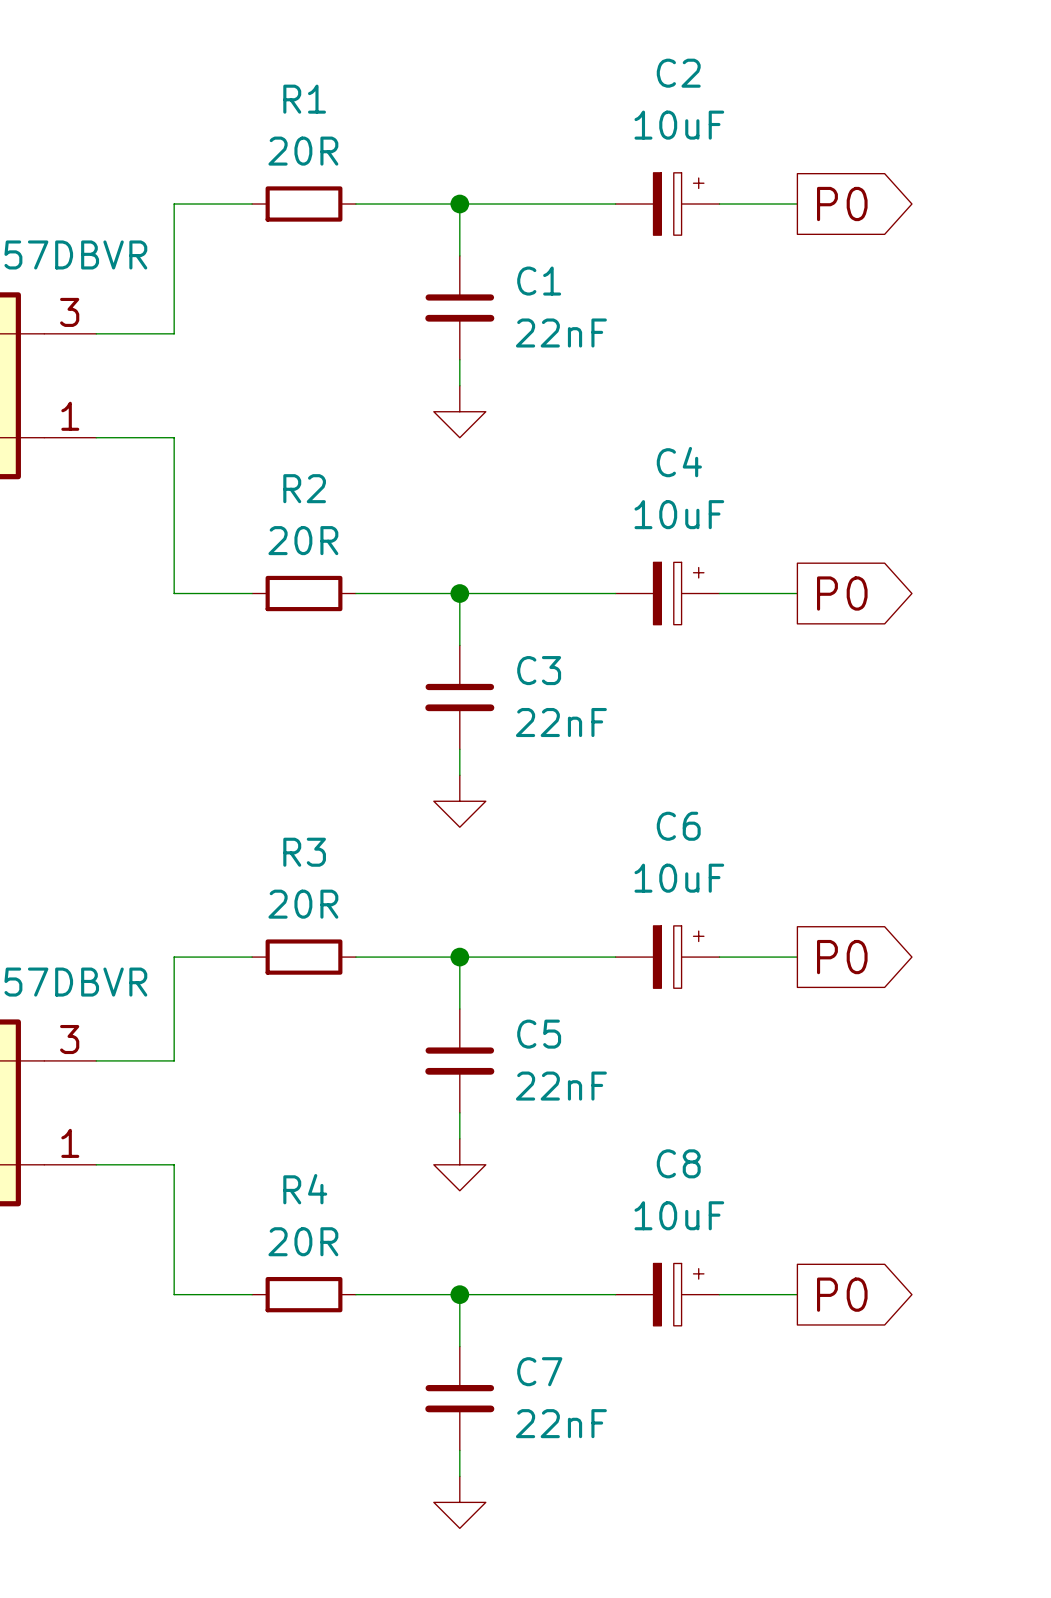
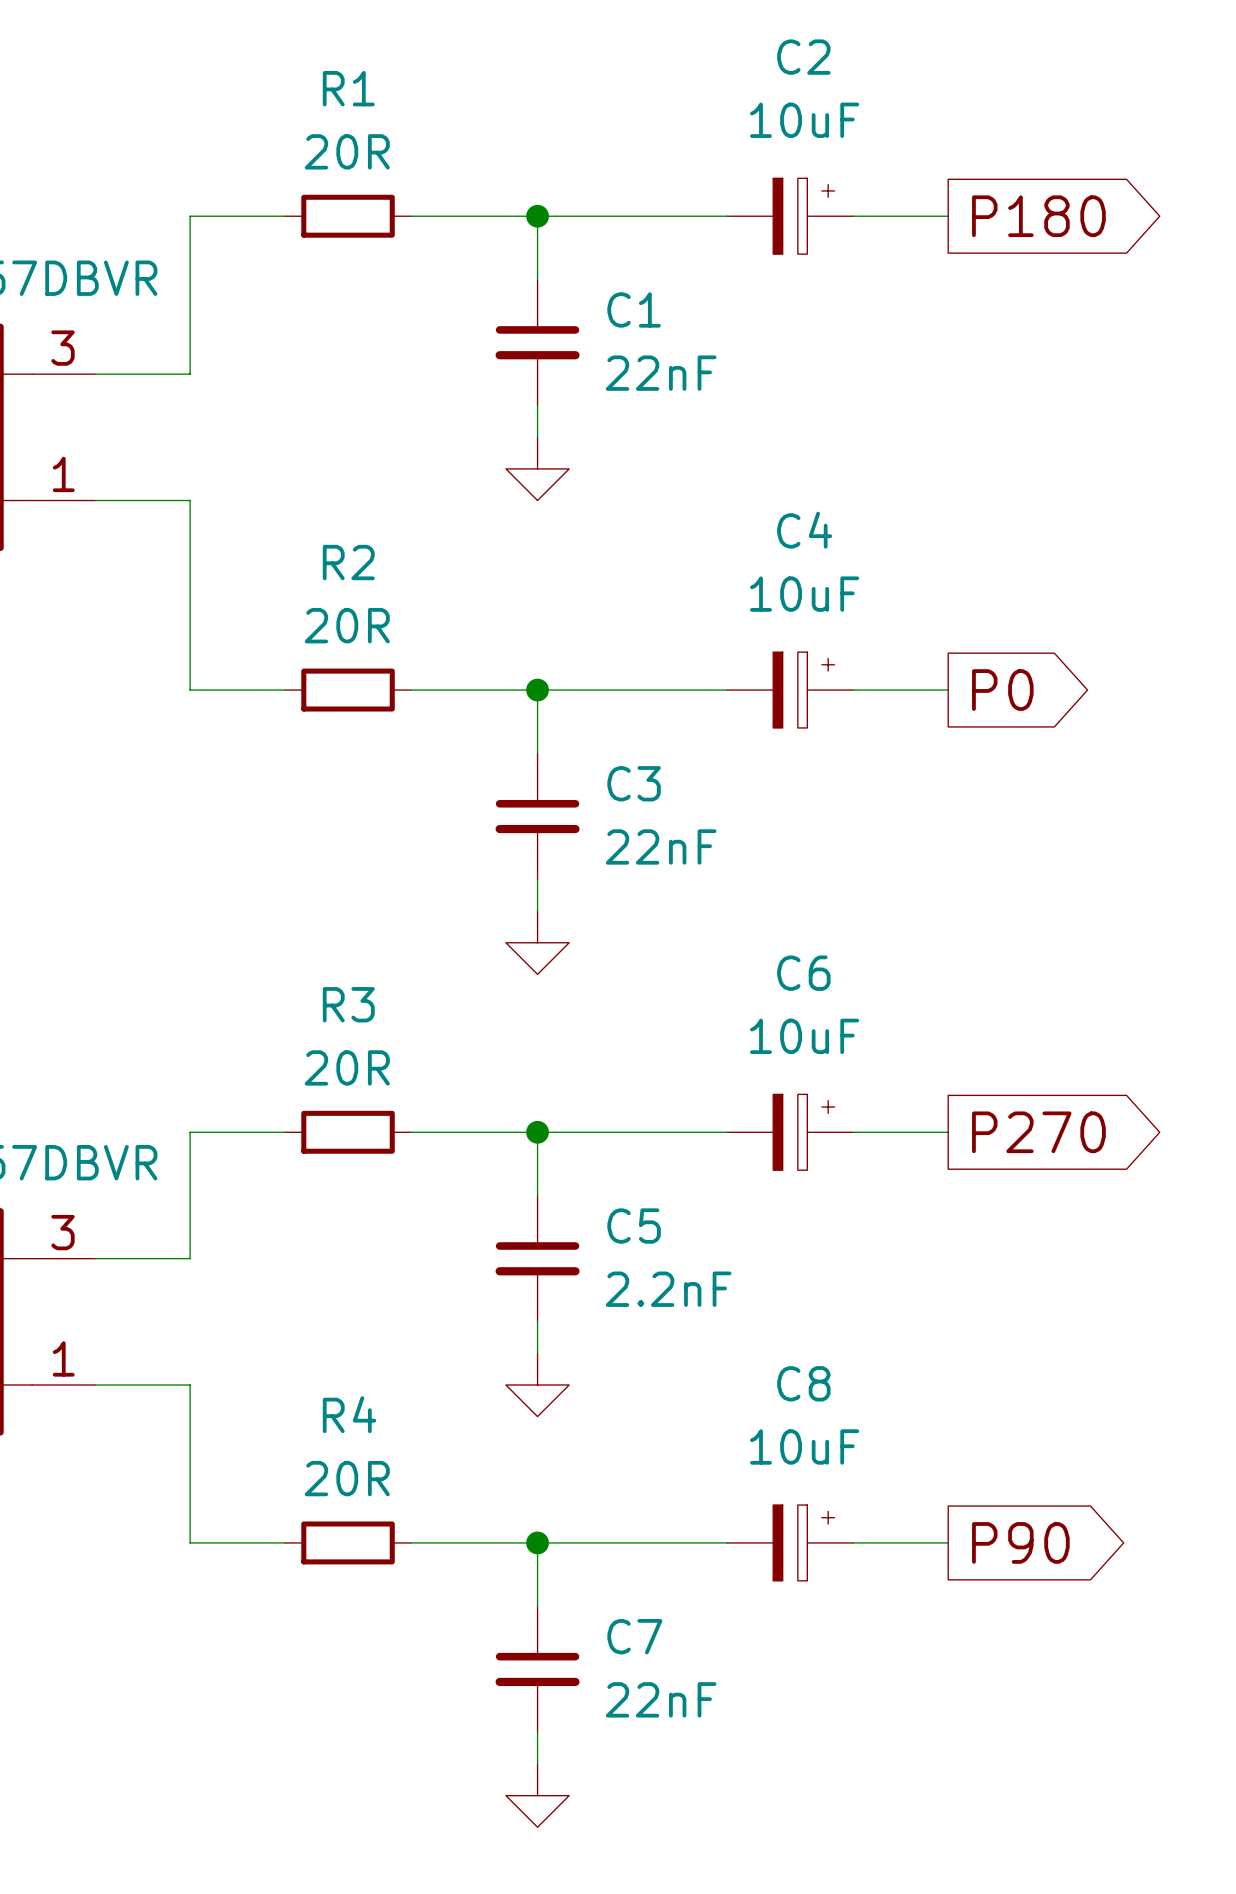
global label: P0 (842, 204) -> P180 (1038, 216)
global label: P0 (842, 957) -> P270 (1038, 1132)
C5 value: 22nF (561, 1086) -> 2.2nF (668, 1289)
global label: P0 (842, 1294) -> P90 (1020, 1542)

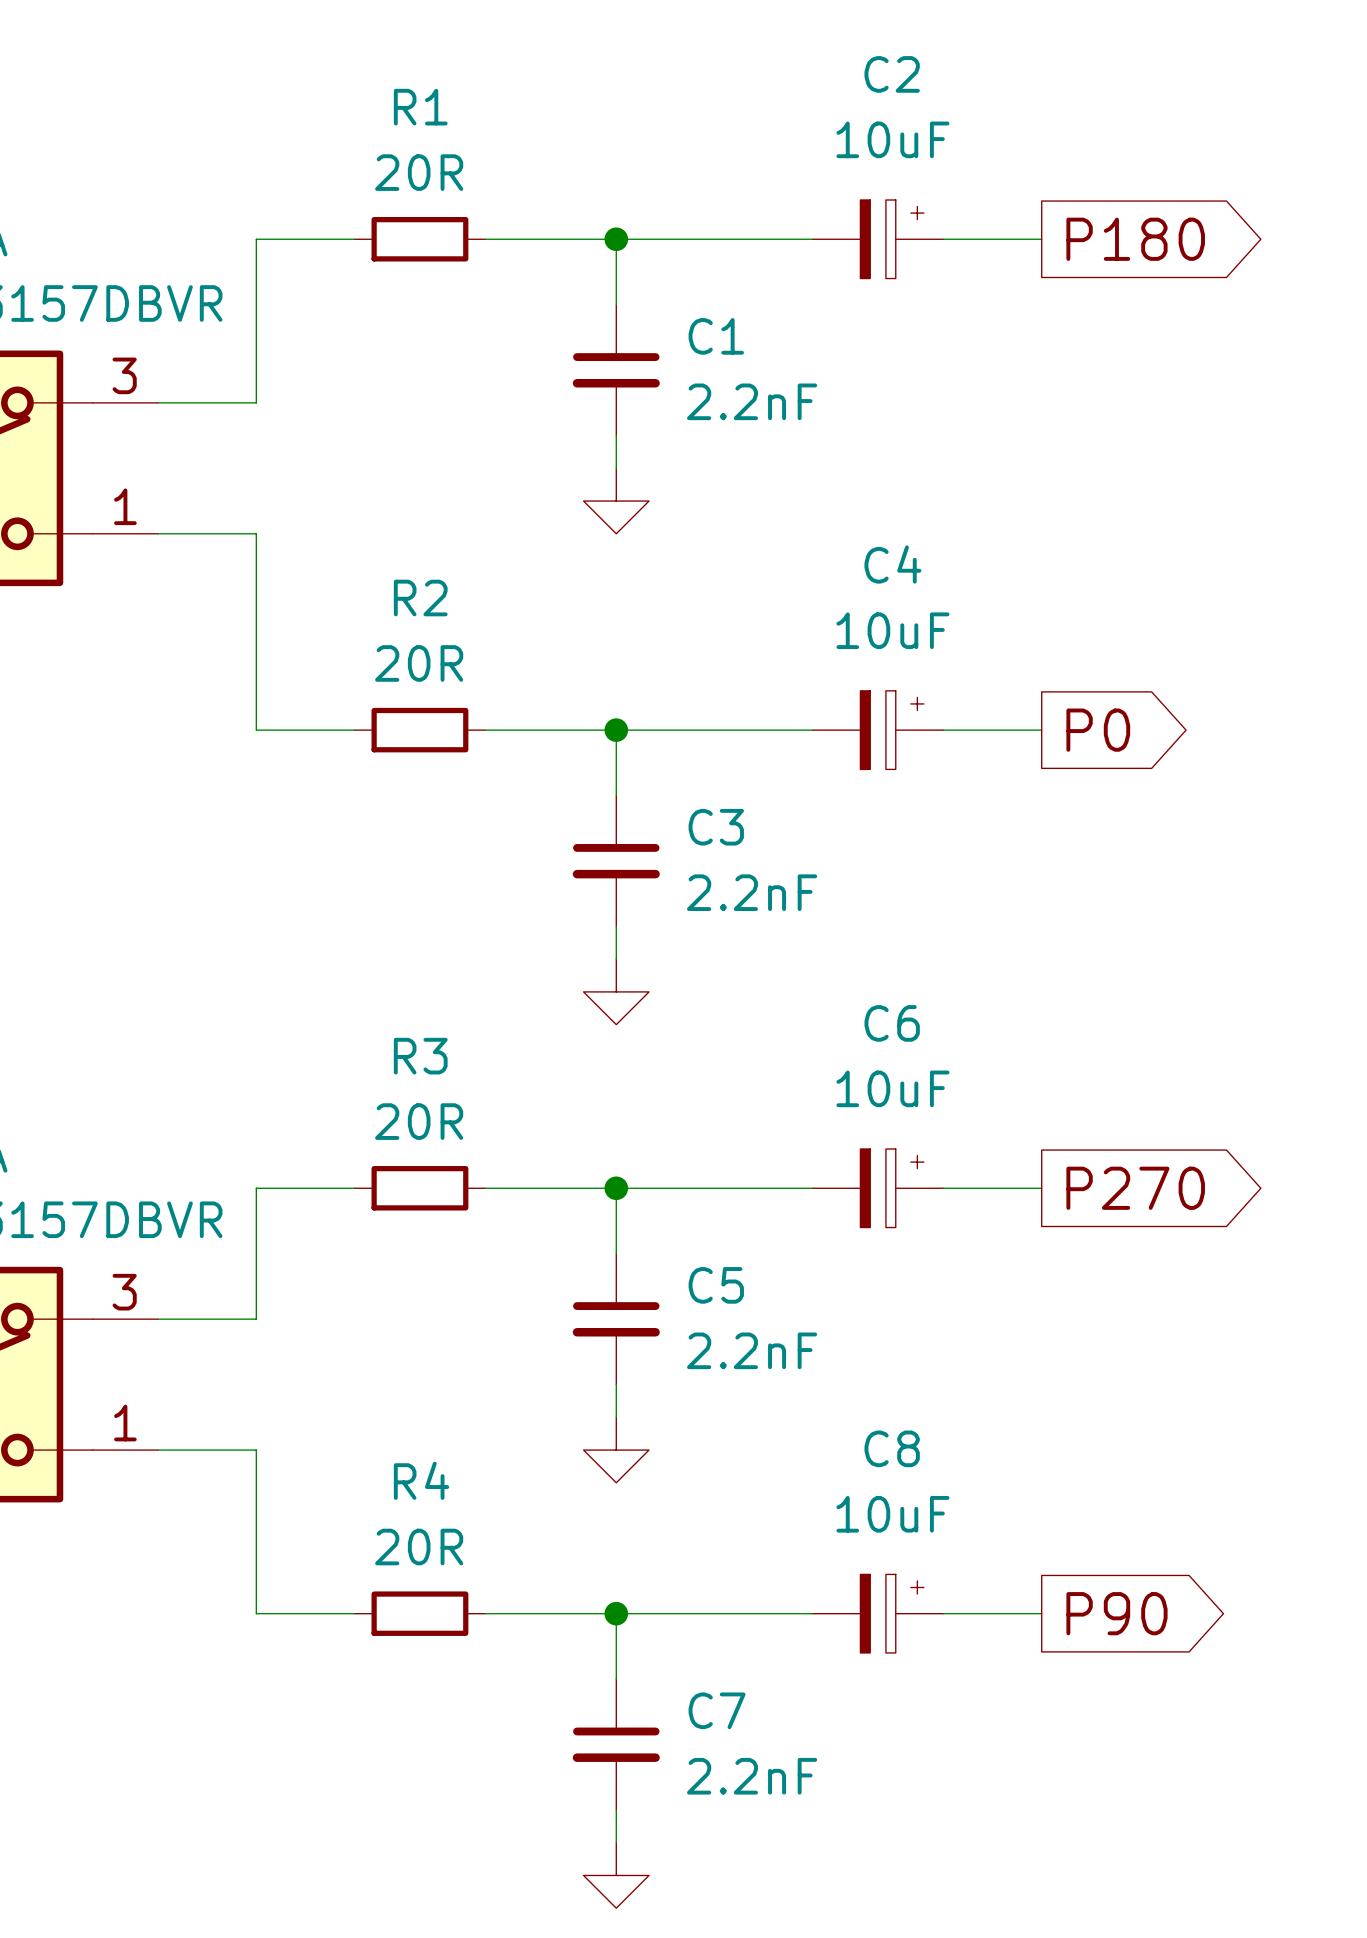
C1 value: 22nF (661, 373) -> 2.2nF (752, 401)
C3 value: 22nF (661, 846) -> 2.2nF (752, 892)
C7 value: 22nF (661, 1699) -> 2.2nF (752, 1776)

